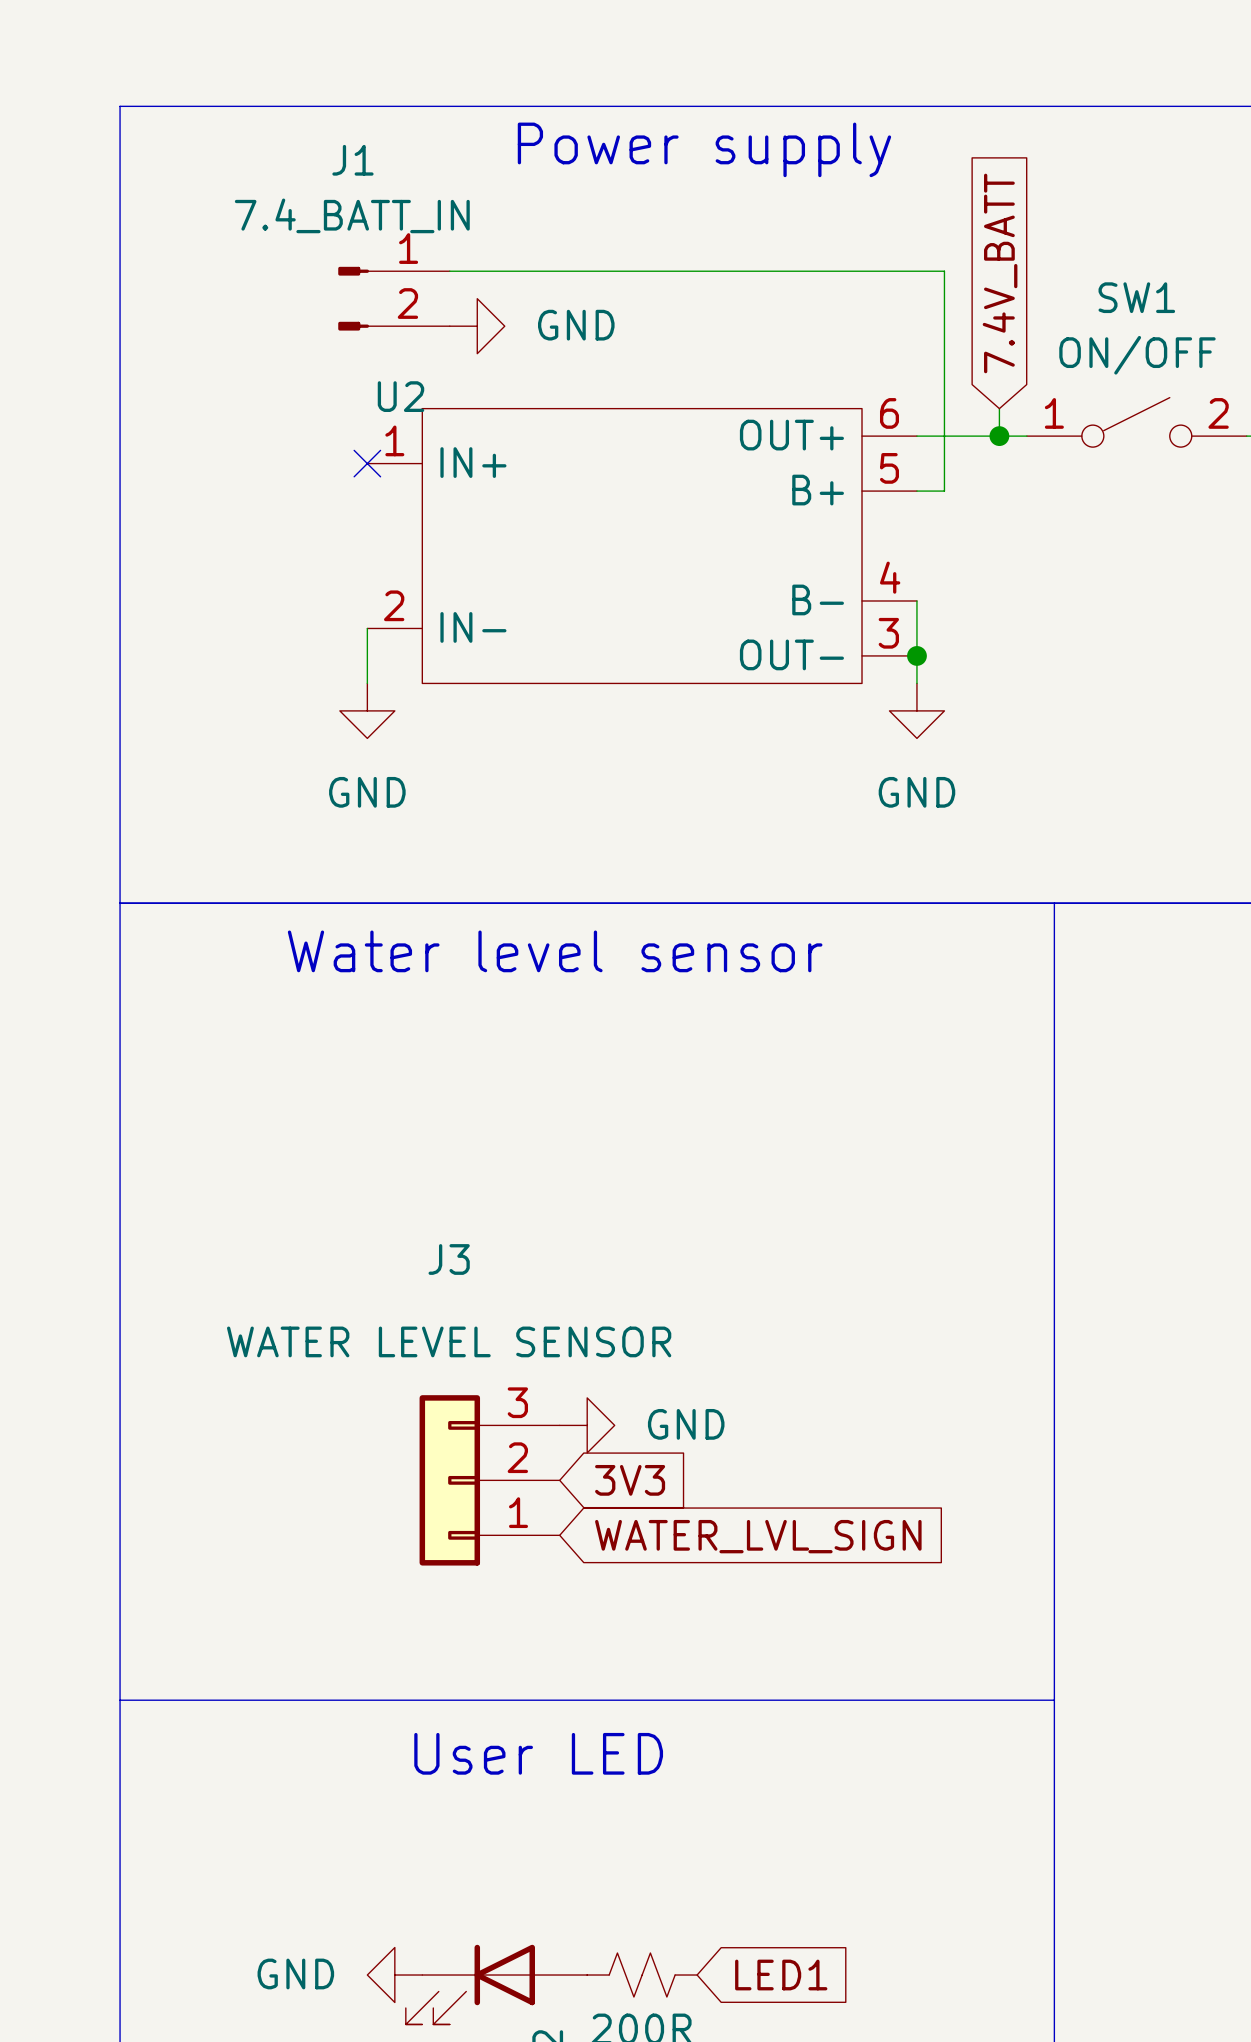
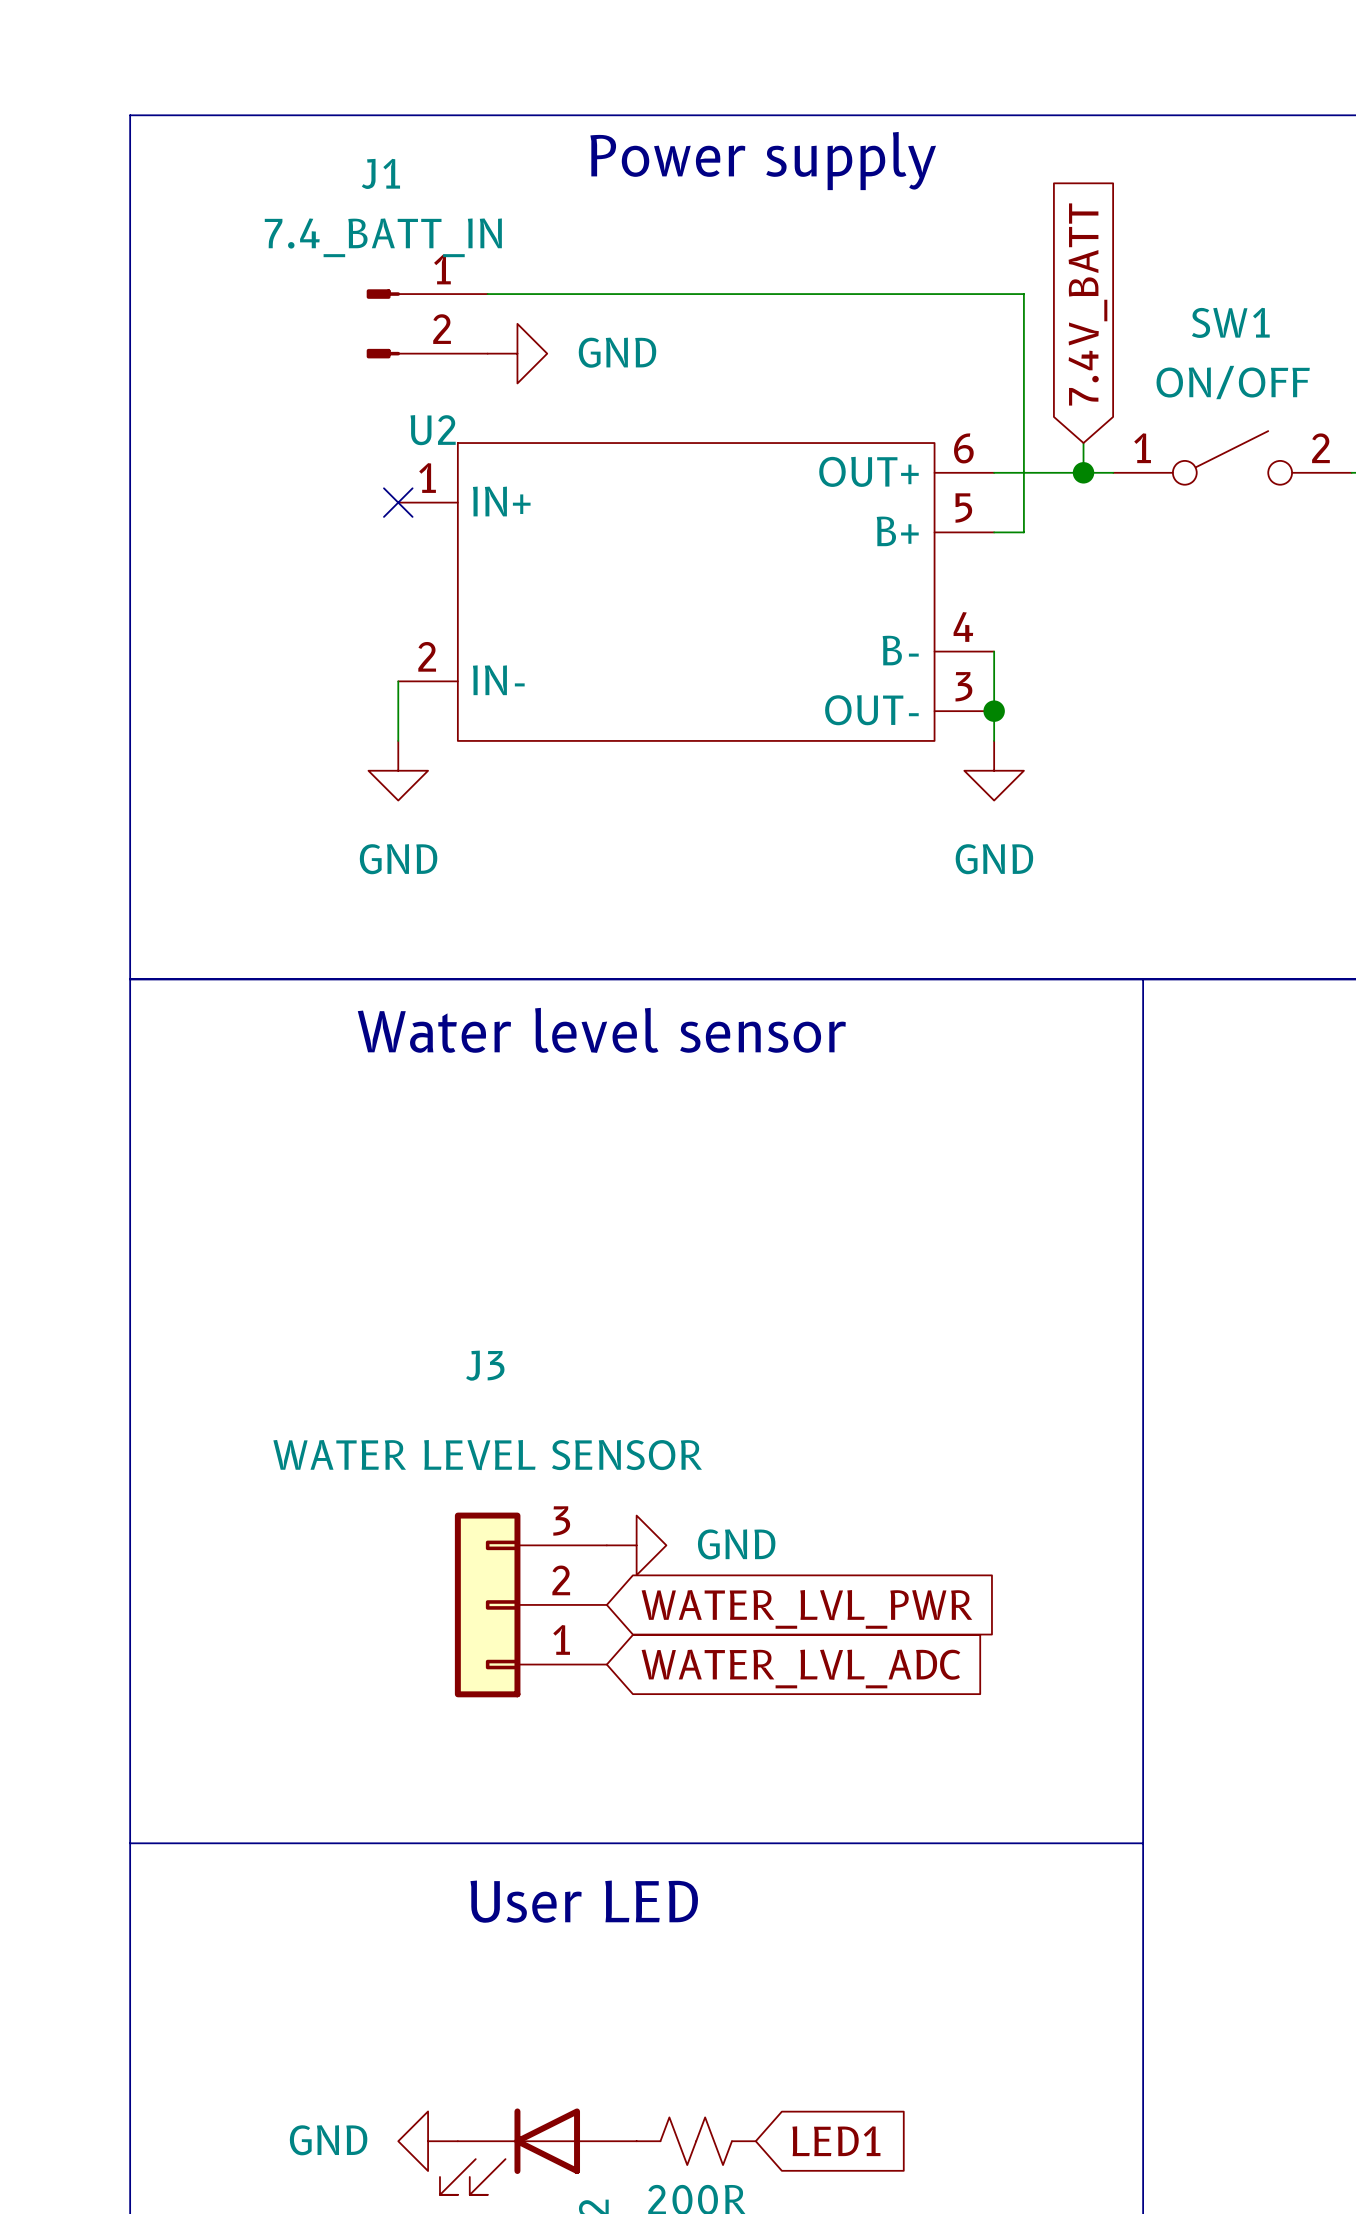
global label: 3V3 (630, 1480) -> WATER_LVL_PWR (806, 1609)
global label: WATER_LVL_SIGN (758, 1536) -> WATER_LVL_ADC (800, 1669)

